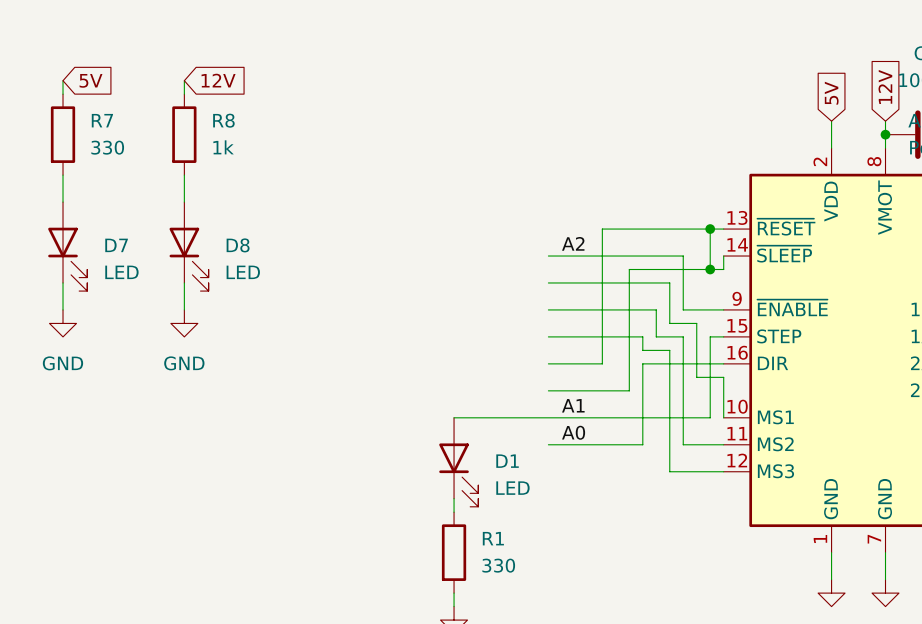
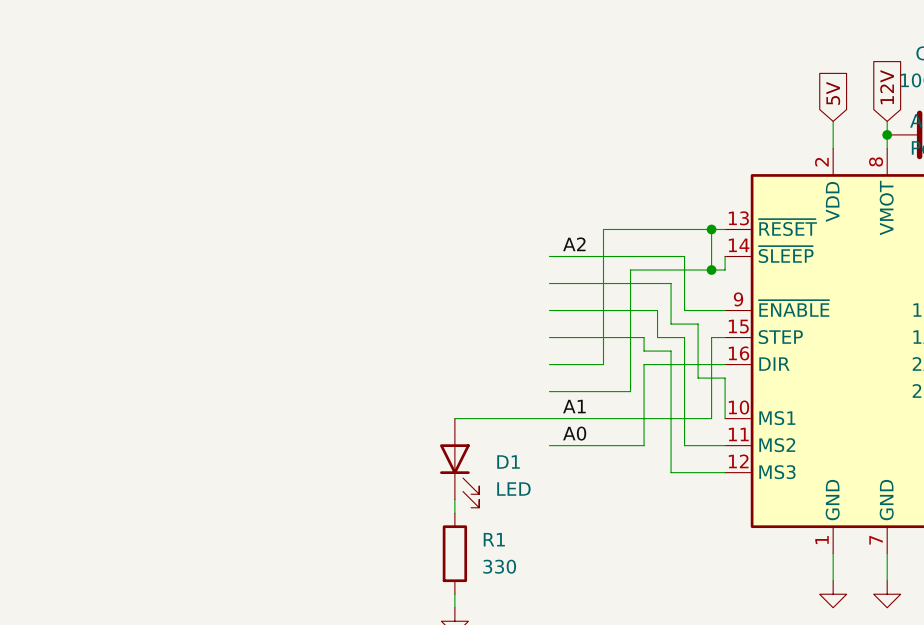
wire: (63, 80) (63, 94) -> none
global label: 5V (91, 80) -> none
wire: (184, 80) (184, 94) -> none
global label: 12V (218, 80) -> none
R7: 330 (63, 134) -> none
R8: 1k (184, 134) -> none
wire: (63, 175) (63, 202) -> none
wire: (184, 175) (184, 202) -> none
D7: LED (67, 246) -> none
D8: LED (189, 246) -> none
wire: (63, 282) (63, 309) -> none
wire: (184, 282) (184, 309) -> none
power symbol: GND (63, 323) -> none
power symbol: GND (184, 323) -> none

